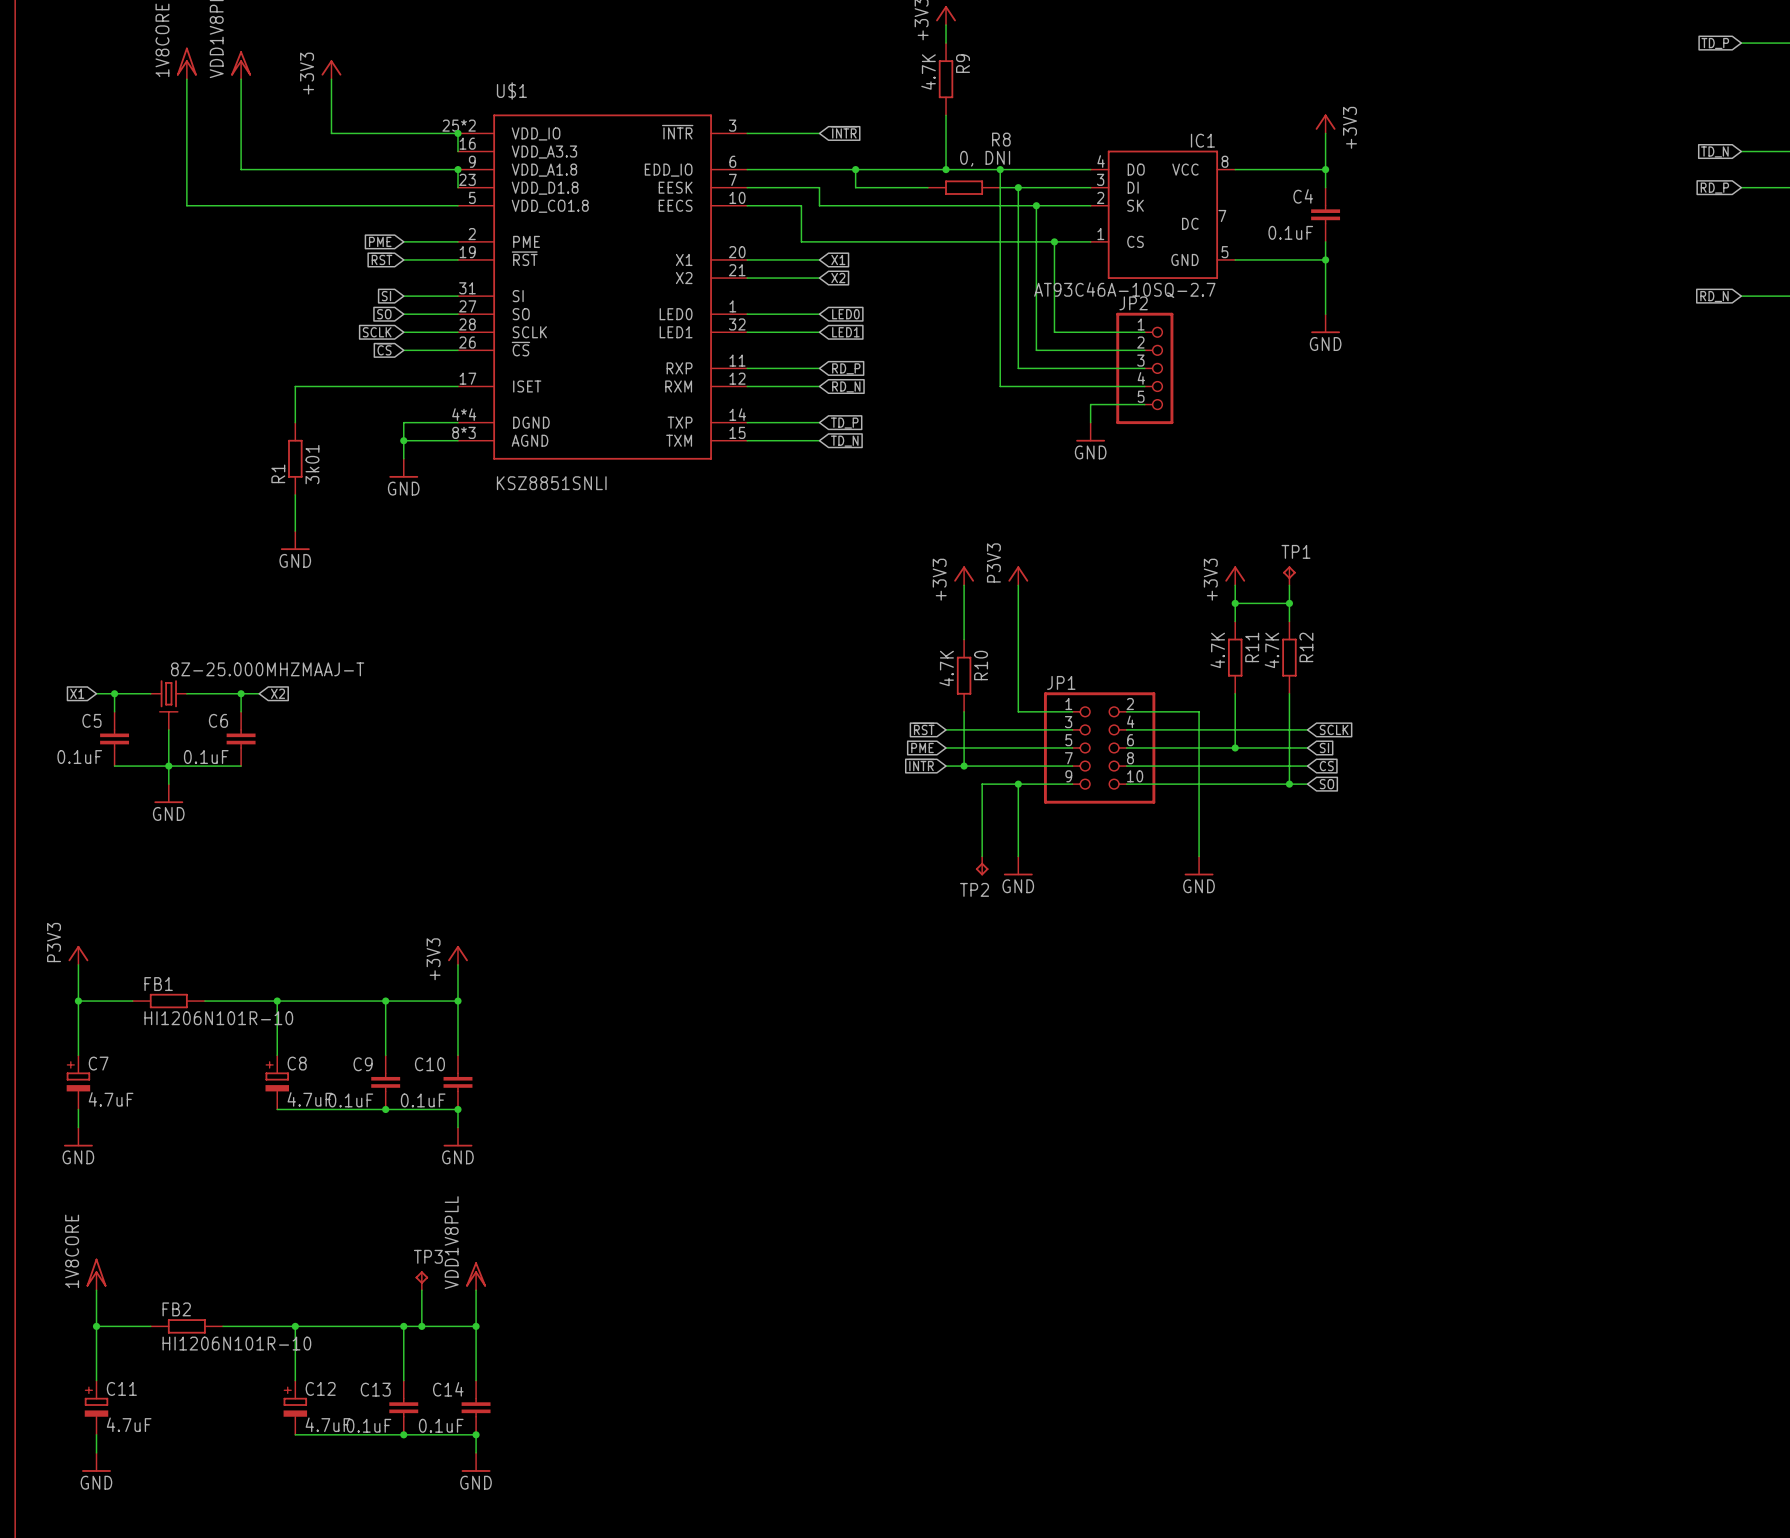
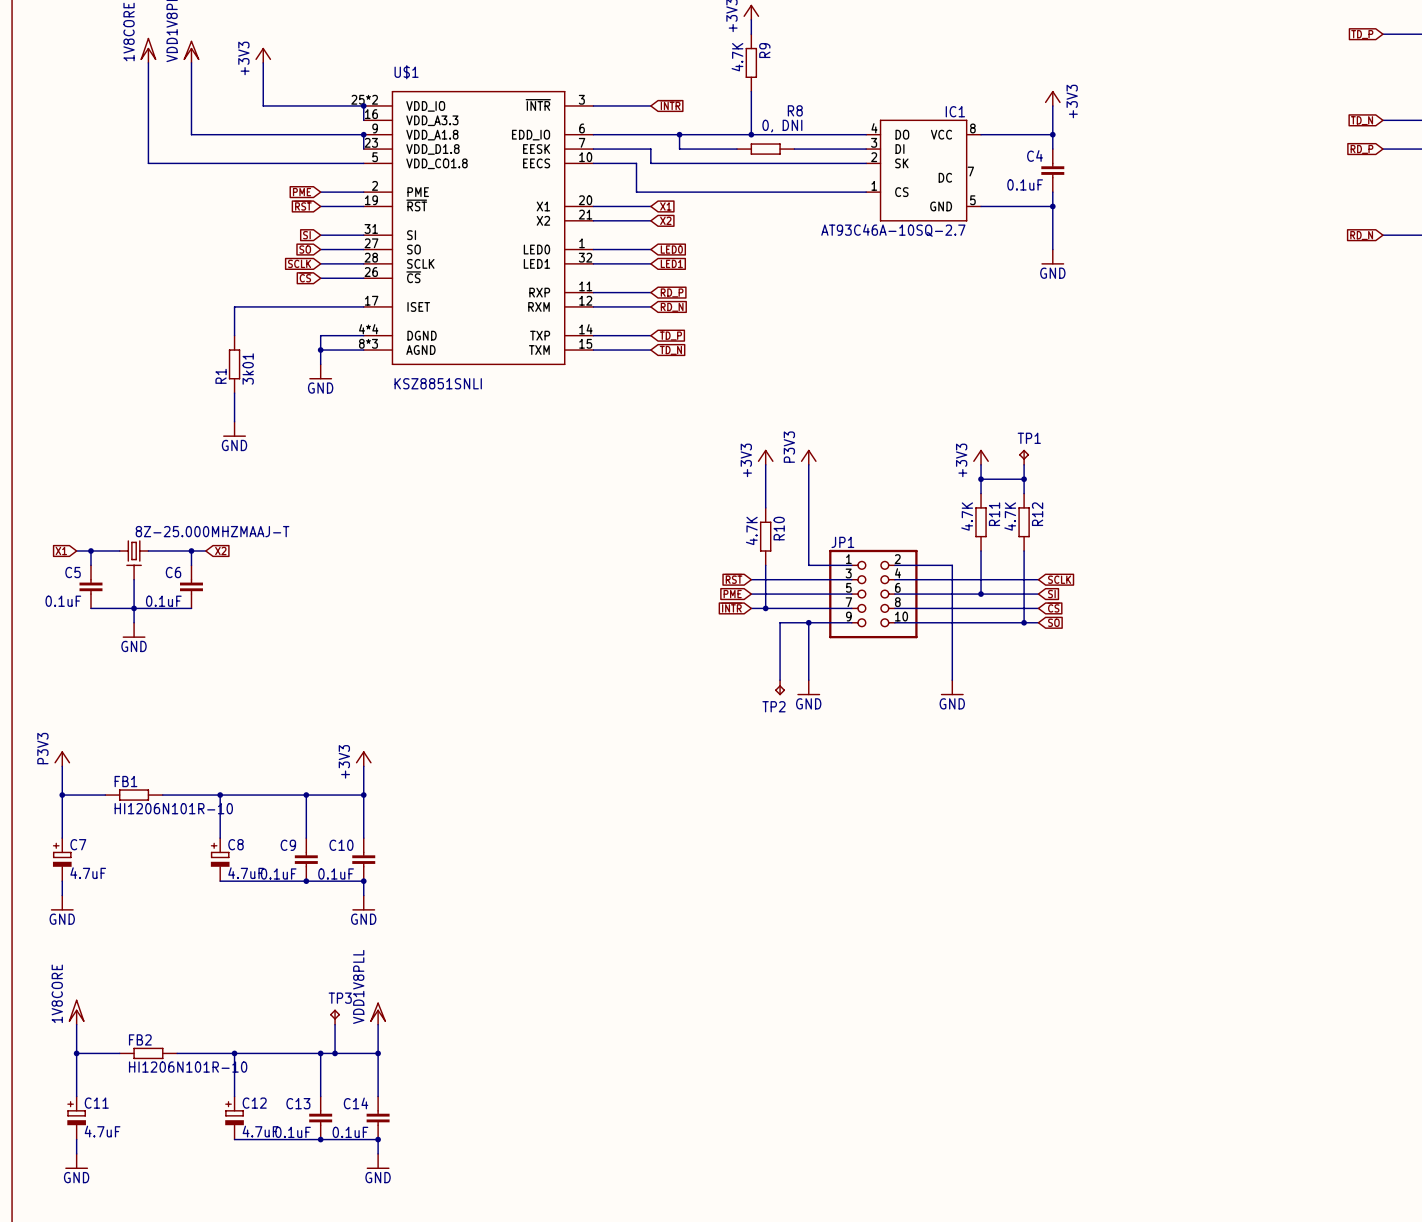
wire: (1000, 169) (1000, 386) (1144, 386) -> none
junction: (1000, 169) -> none
wire: (1018, 187) (1018, 368) (1144, 368) -> none
junction: (1018, 187) -> none
wire: (1036, 205) (1036, 350) (1144, 350) -> none
junction: (1036, 205) -> none
wire: (1054, 241) (1054, 332) (1144, 332) -> none
junction: (1054, 241) -> none
JP2: (1144, 368) -> none
wire: (1144, 404) (1090, 404) (1090, 422) -> none
power symbol: GND (1090, 432) -> none

